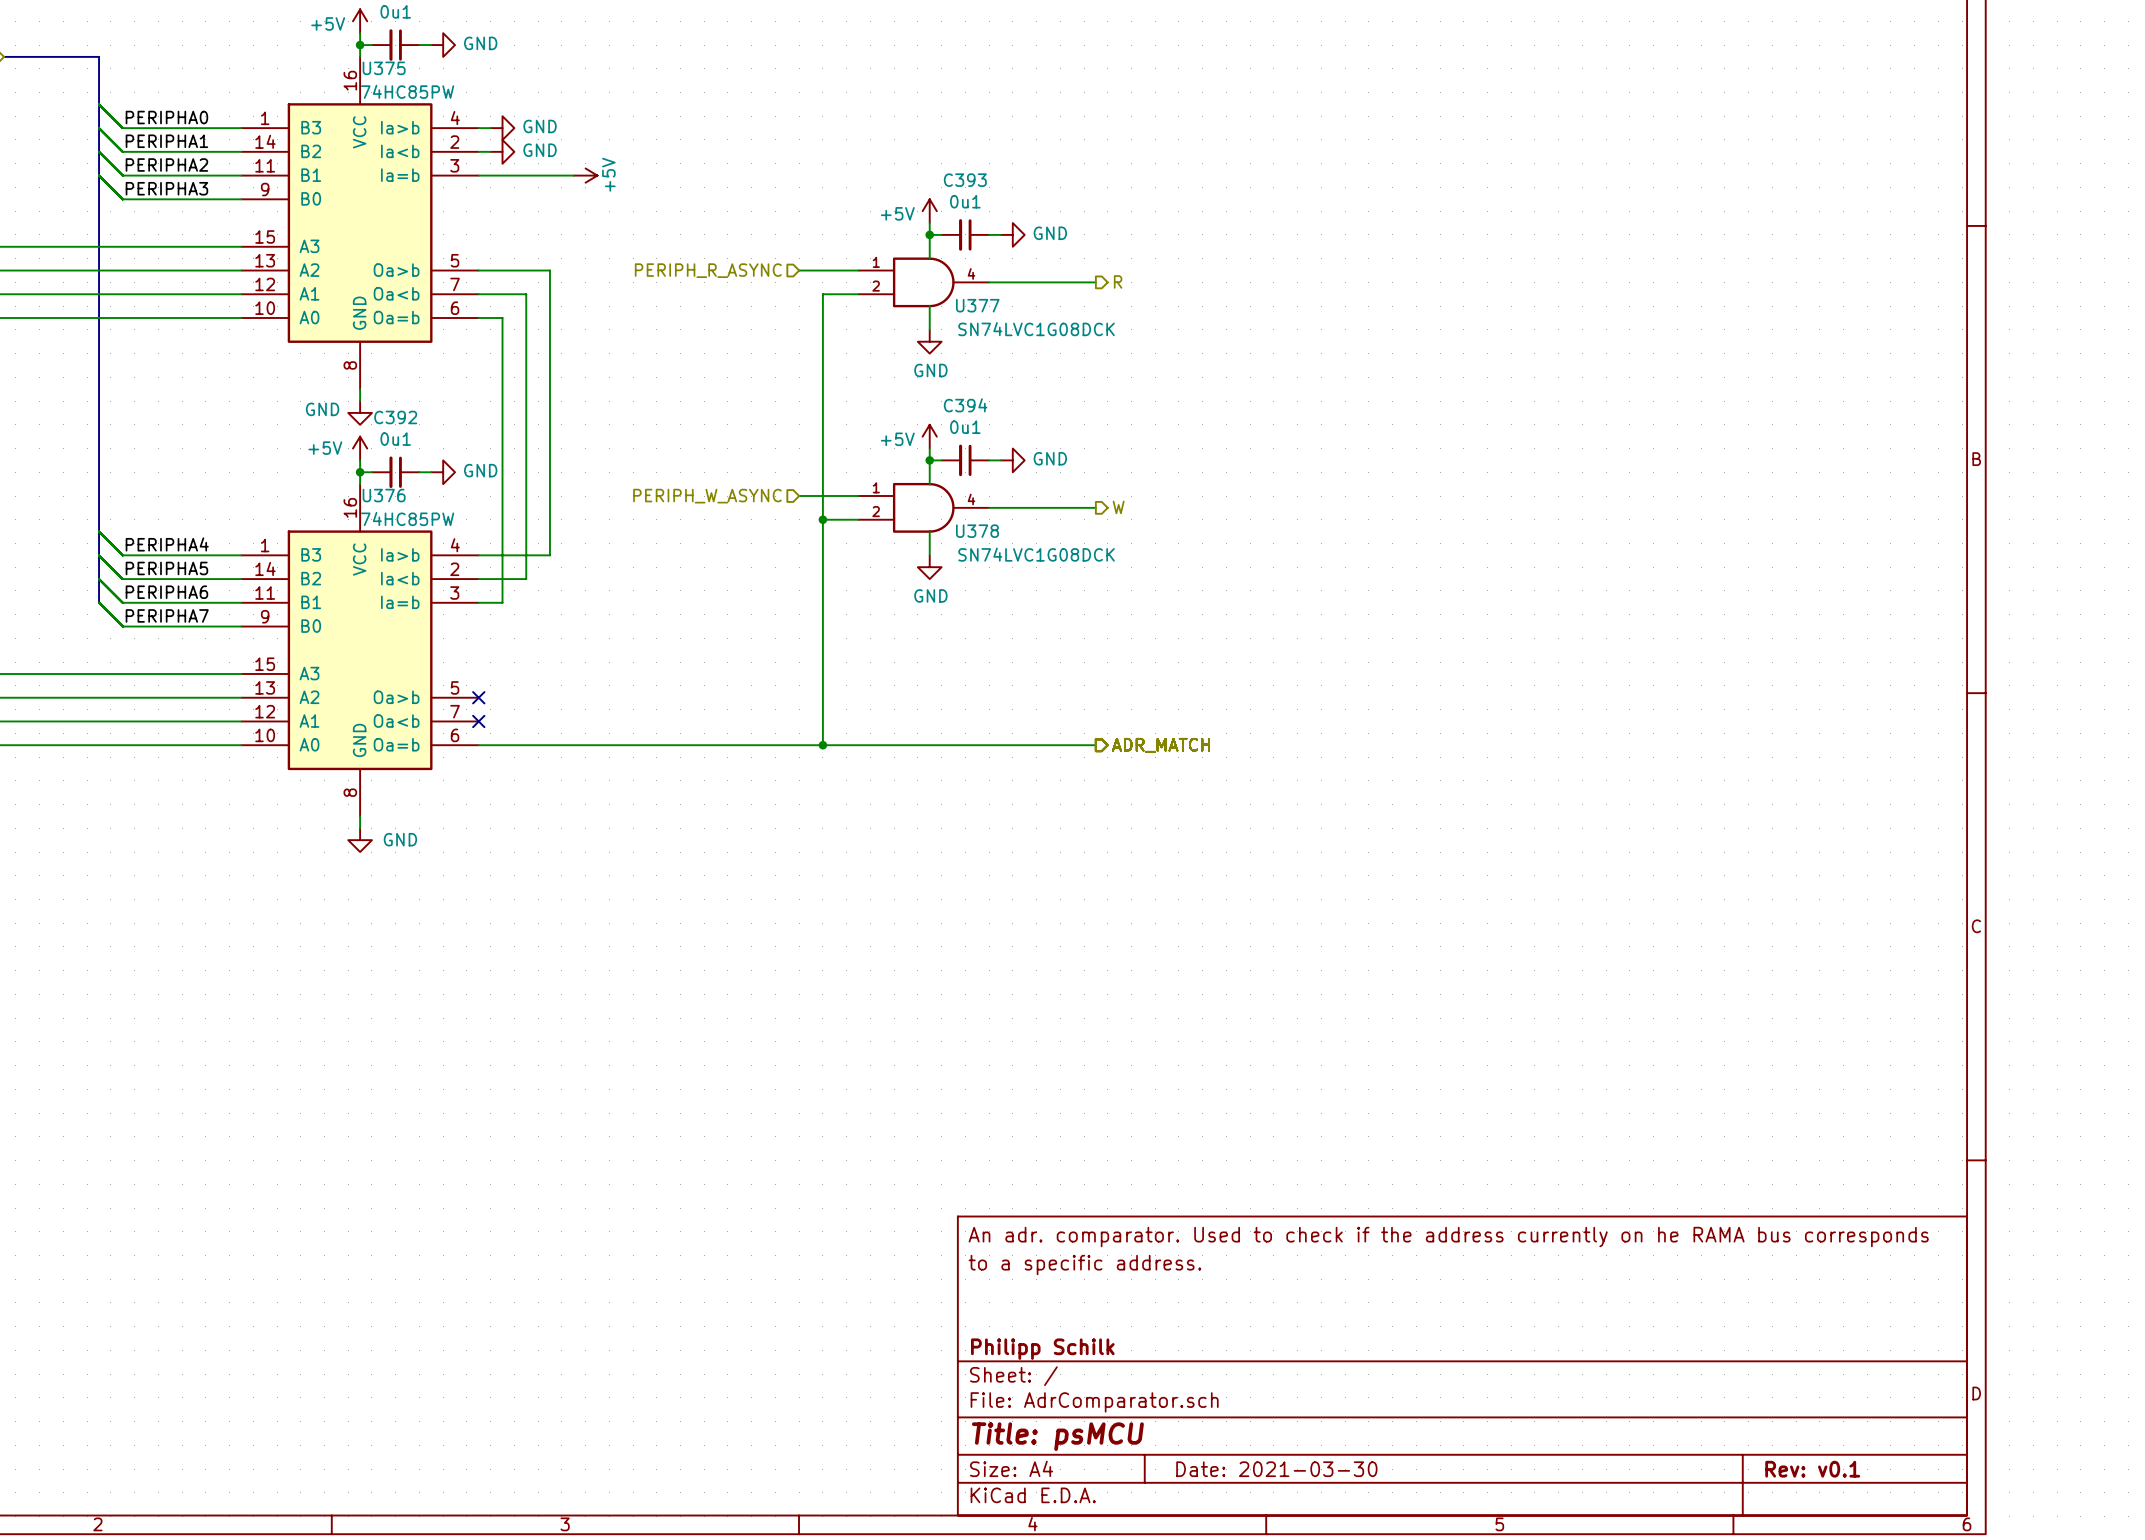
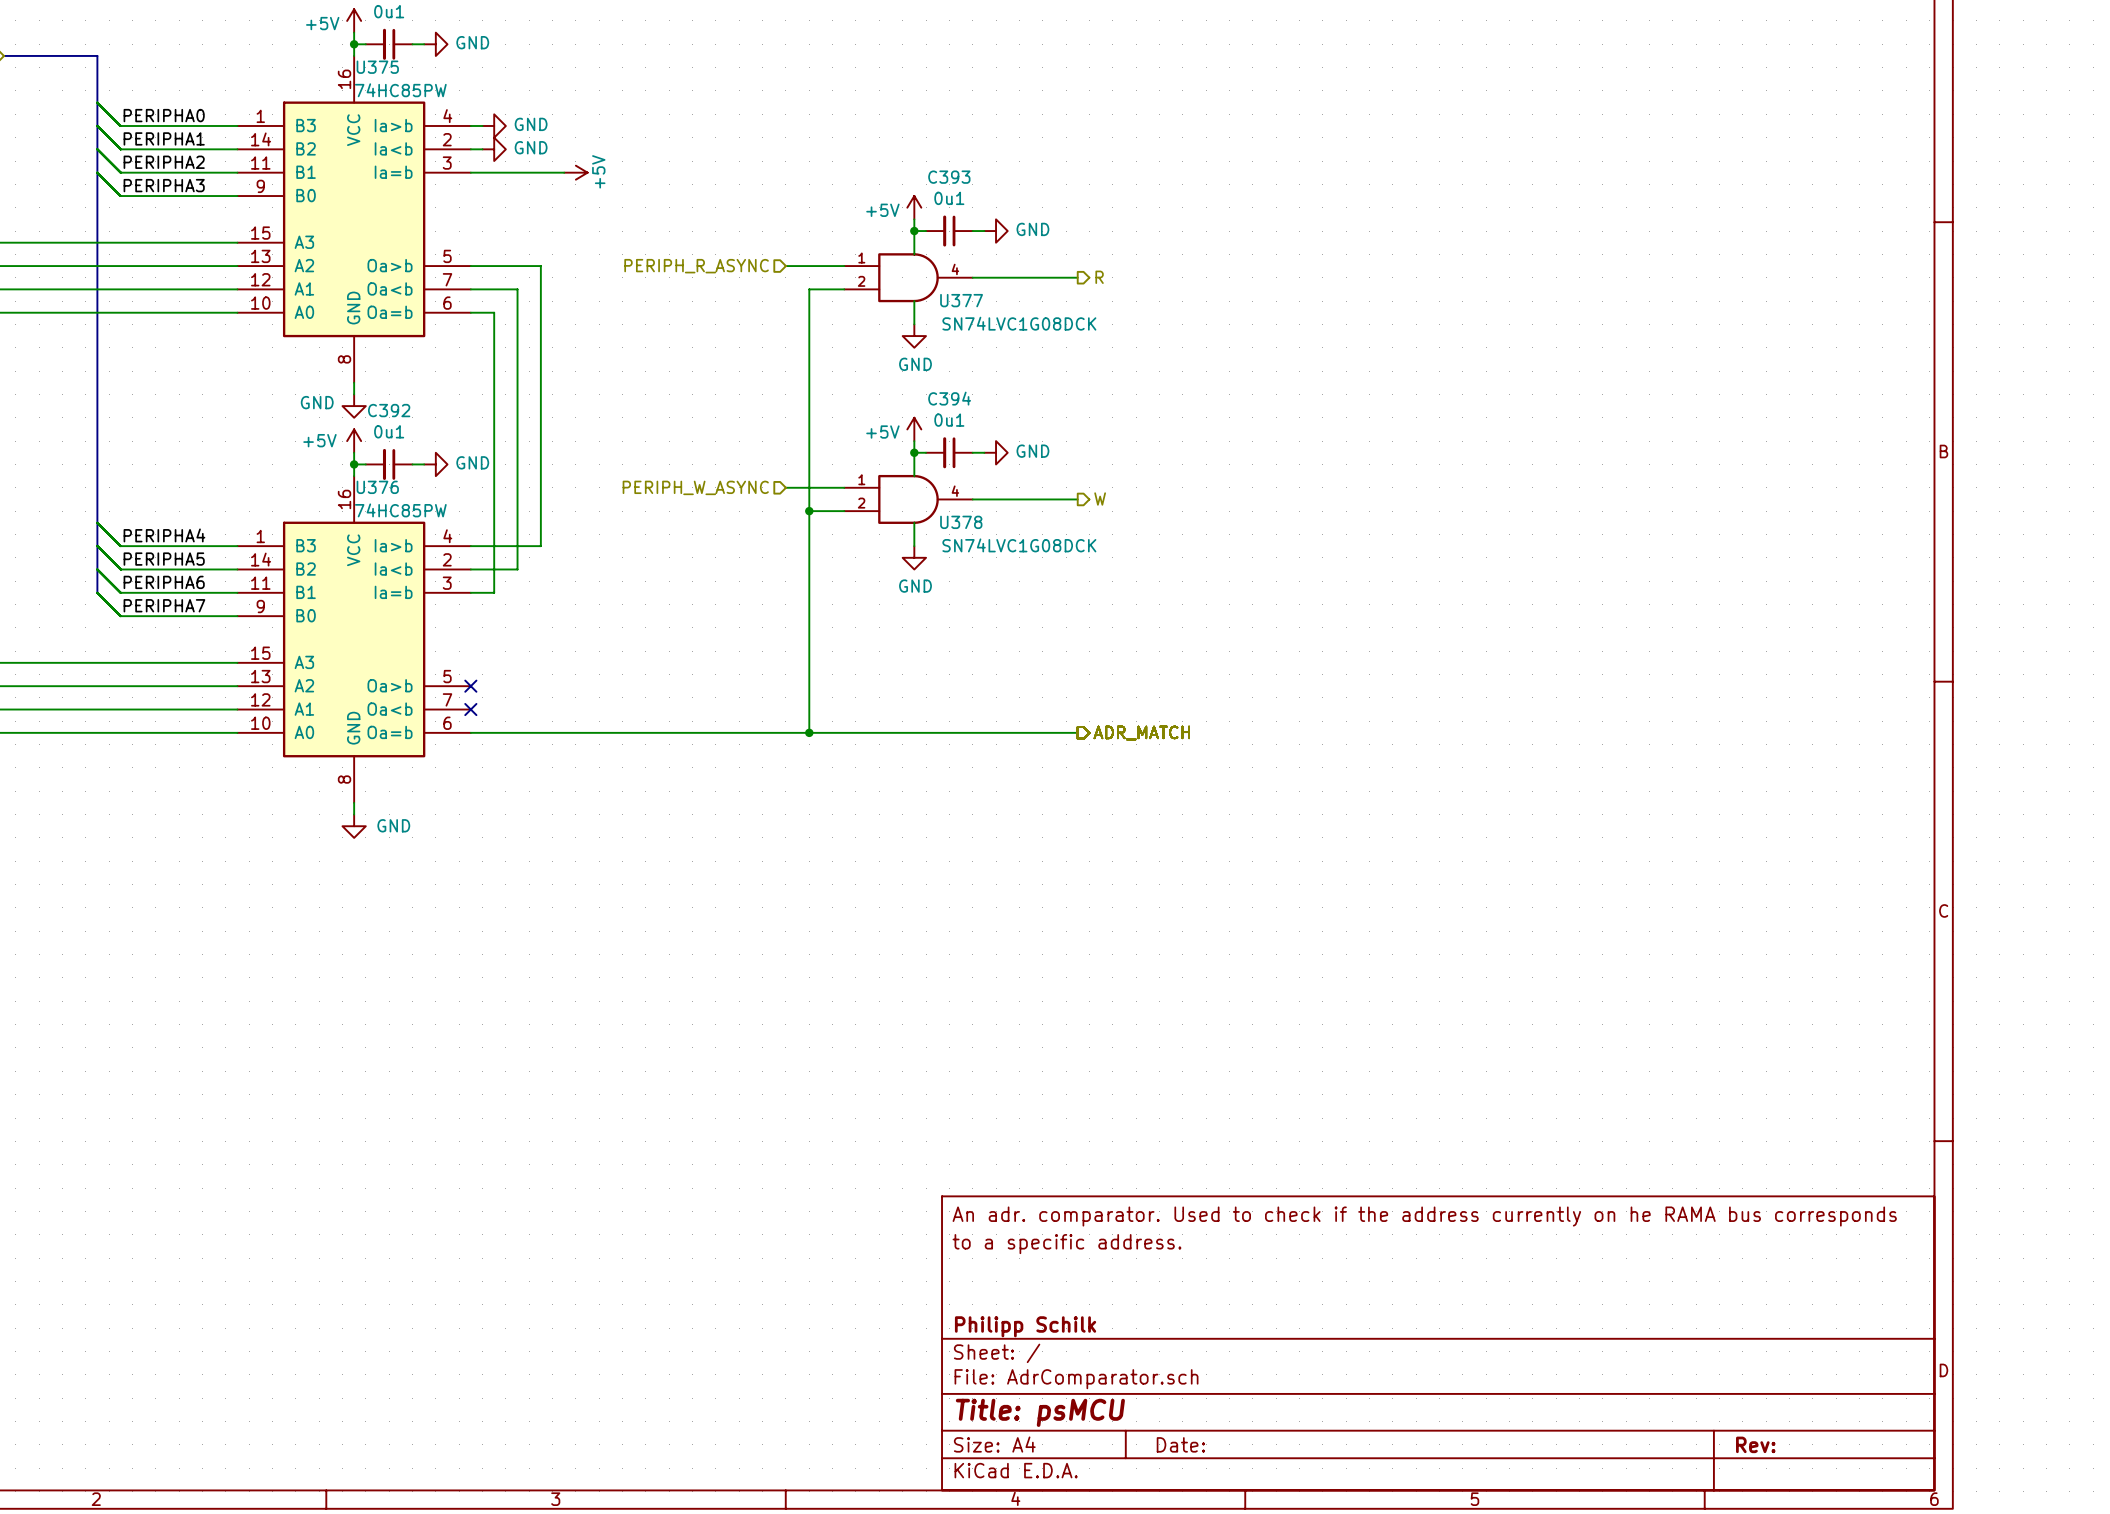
title block: Date: 2021-03-30 (1276, 1469) -> Date: (1180, 1444)
title block: Rev: v0.1 (1812, 1469) -> Rev: (1755, 1444)

